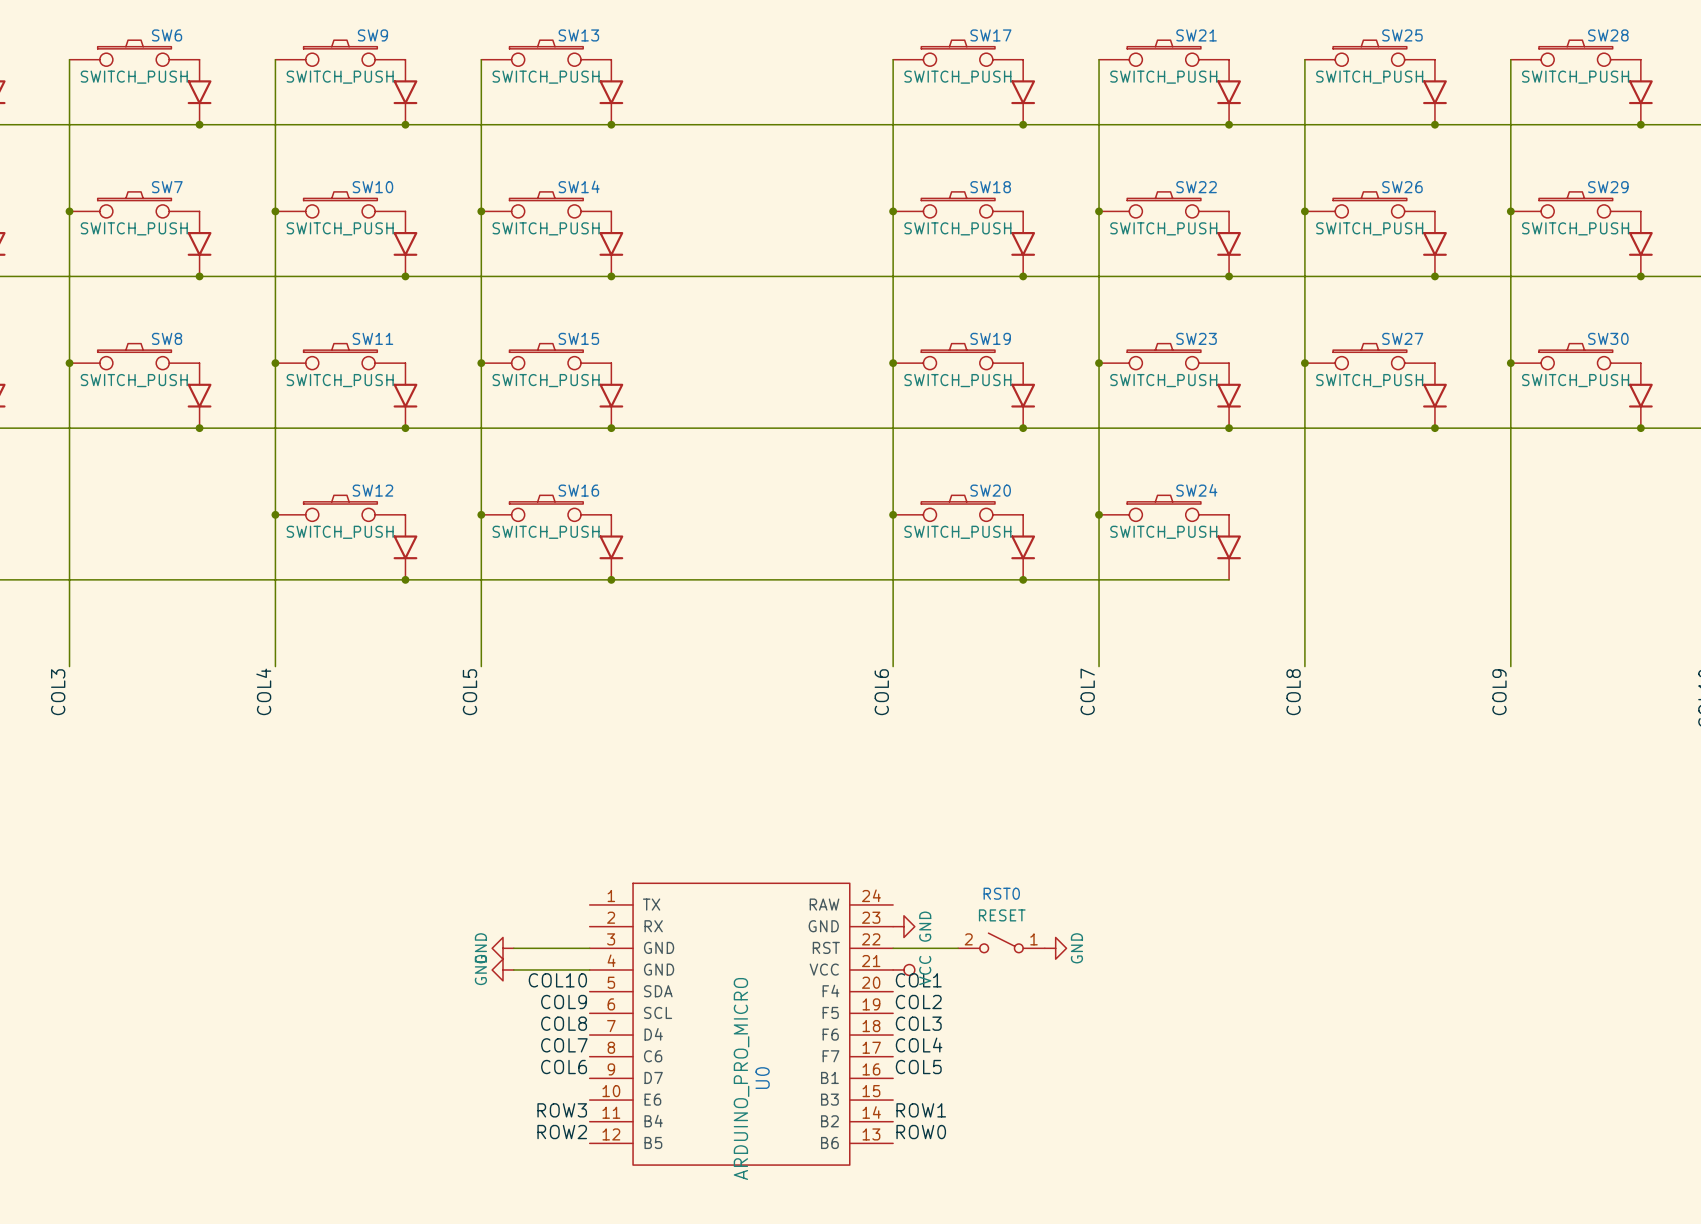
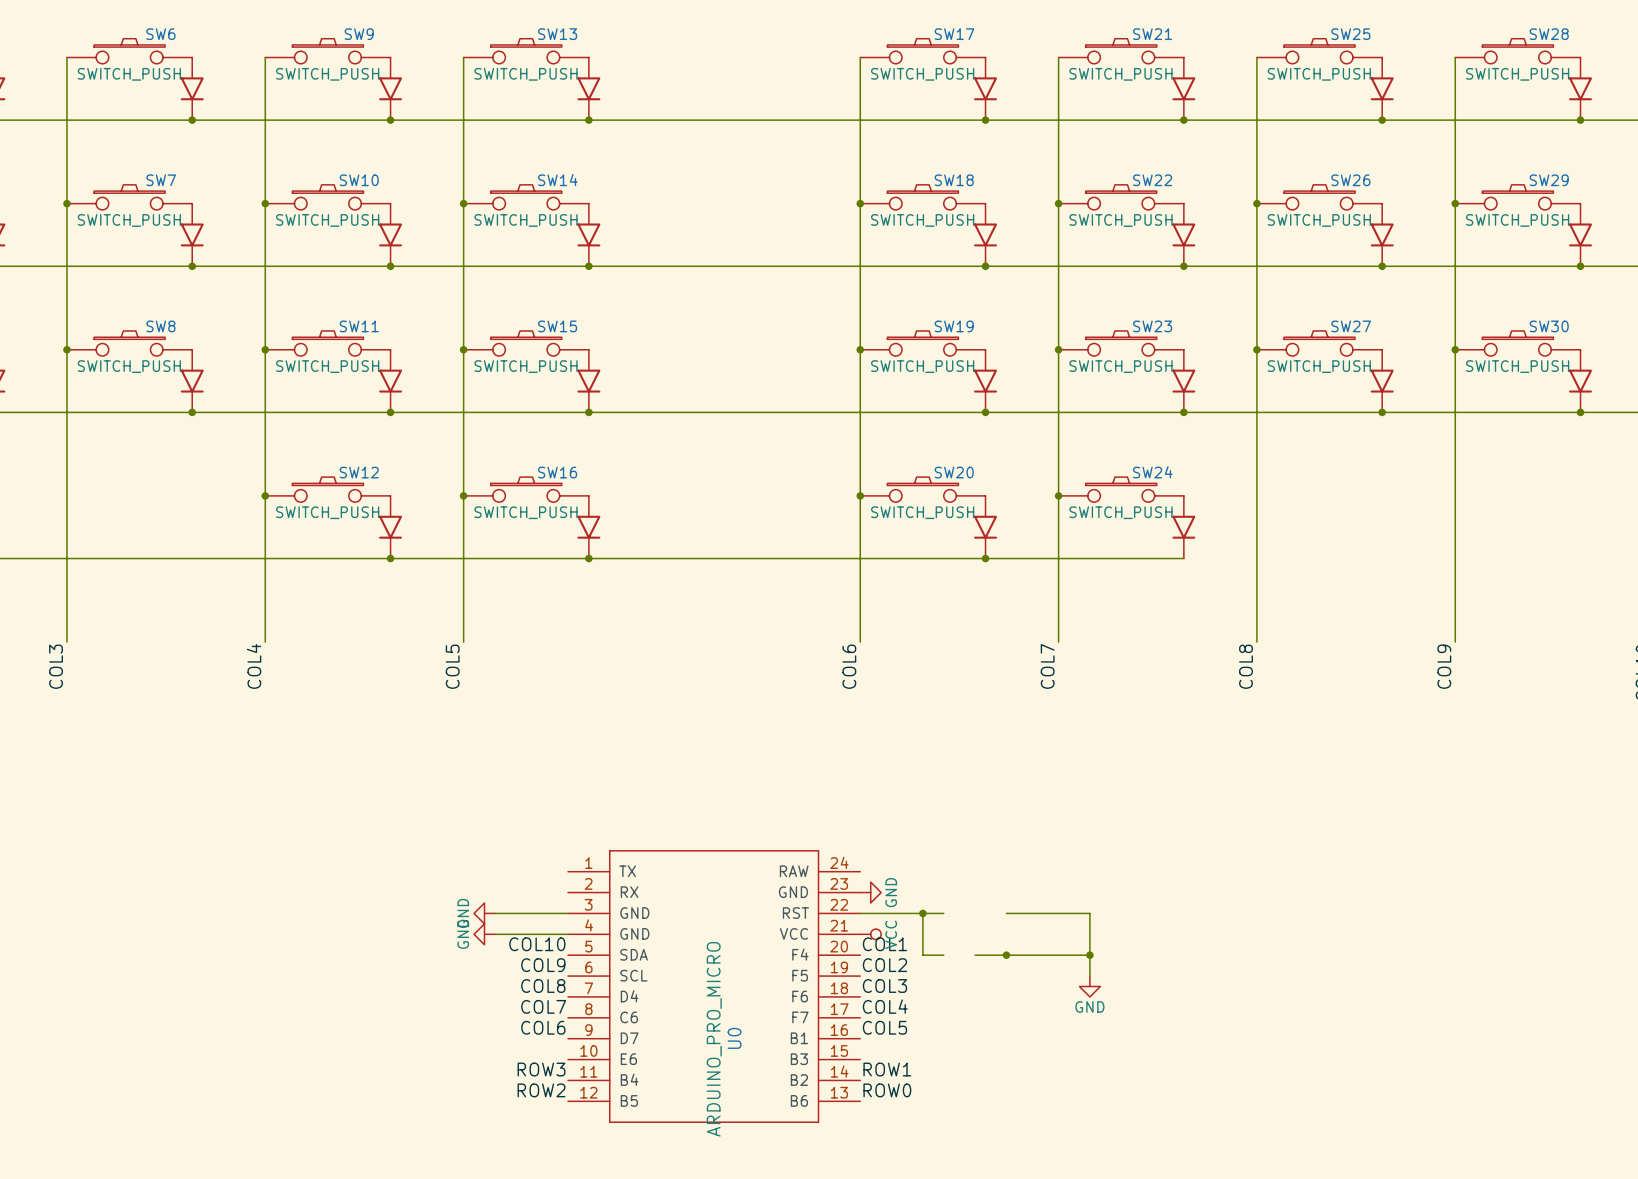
RST0: RESET (1001, 942) -> none
junction: none -> (922, 913)
wire: none -> (943, 913) (922, 913) (922, 955) (943, 955)
wire: none -> (1006, 913) (1089, 913) (1089, 976)
power symbol rotation: 0° (1055, 948) -> 90° clockwise (1089, 986)
power symbol position: GND (1055, 948) -> GND (1089, 986)
wire: none -> (975, 955) (1089, 955)
junction: none -> (1006, 955)
junction: none -> (1089, 955)

